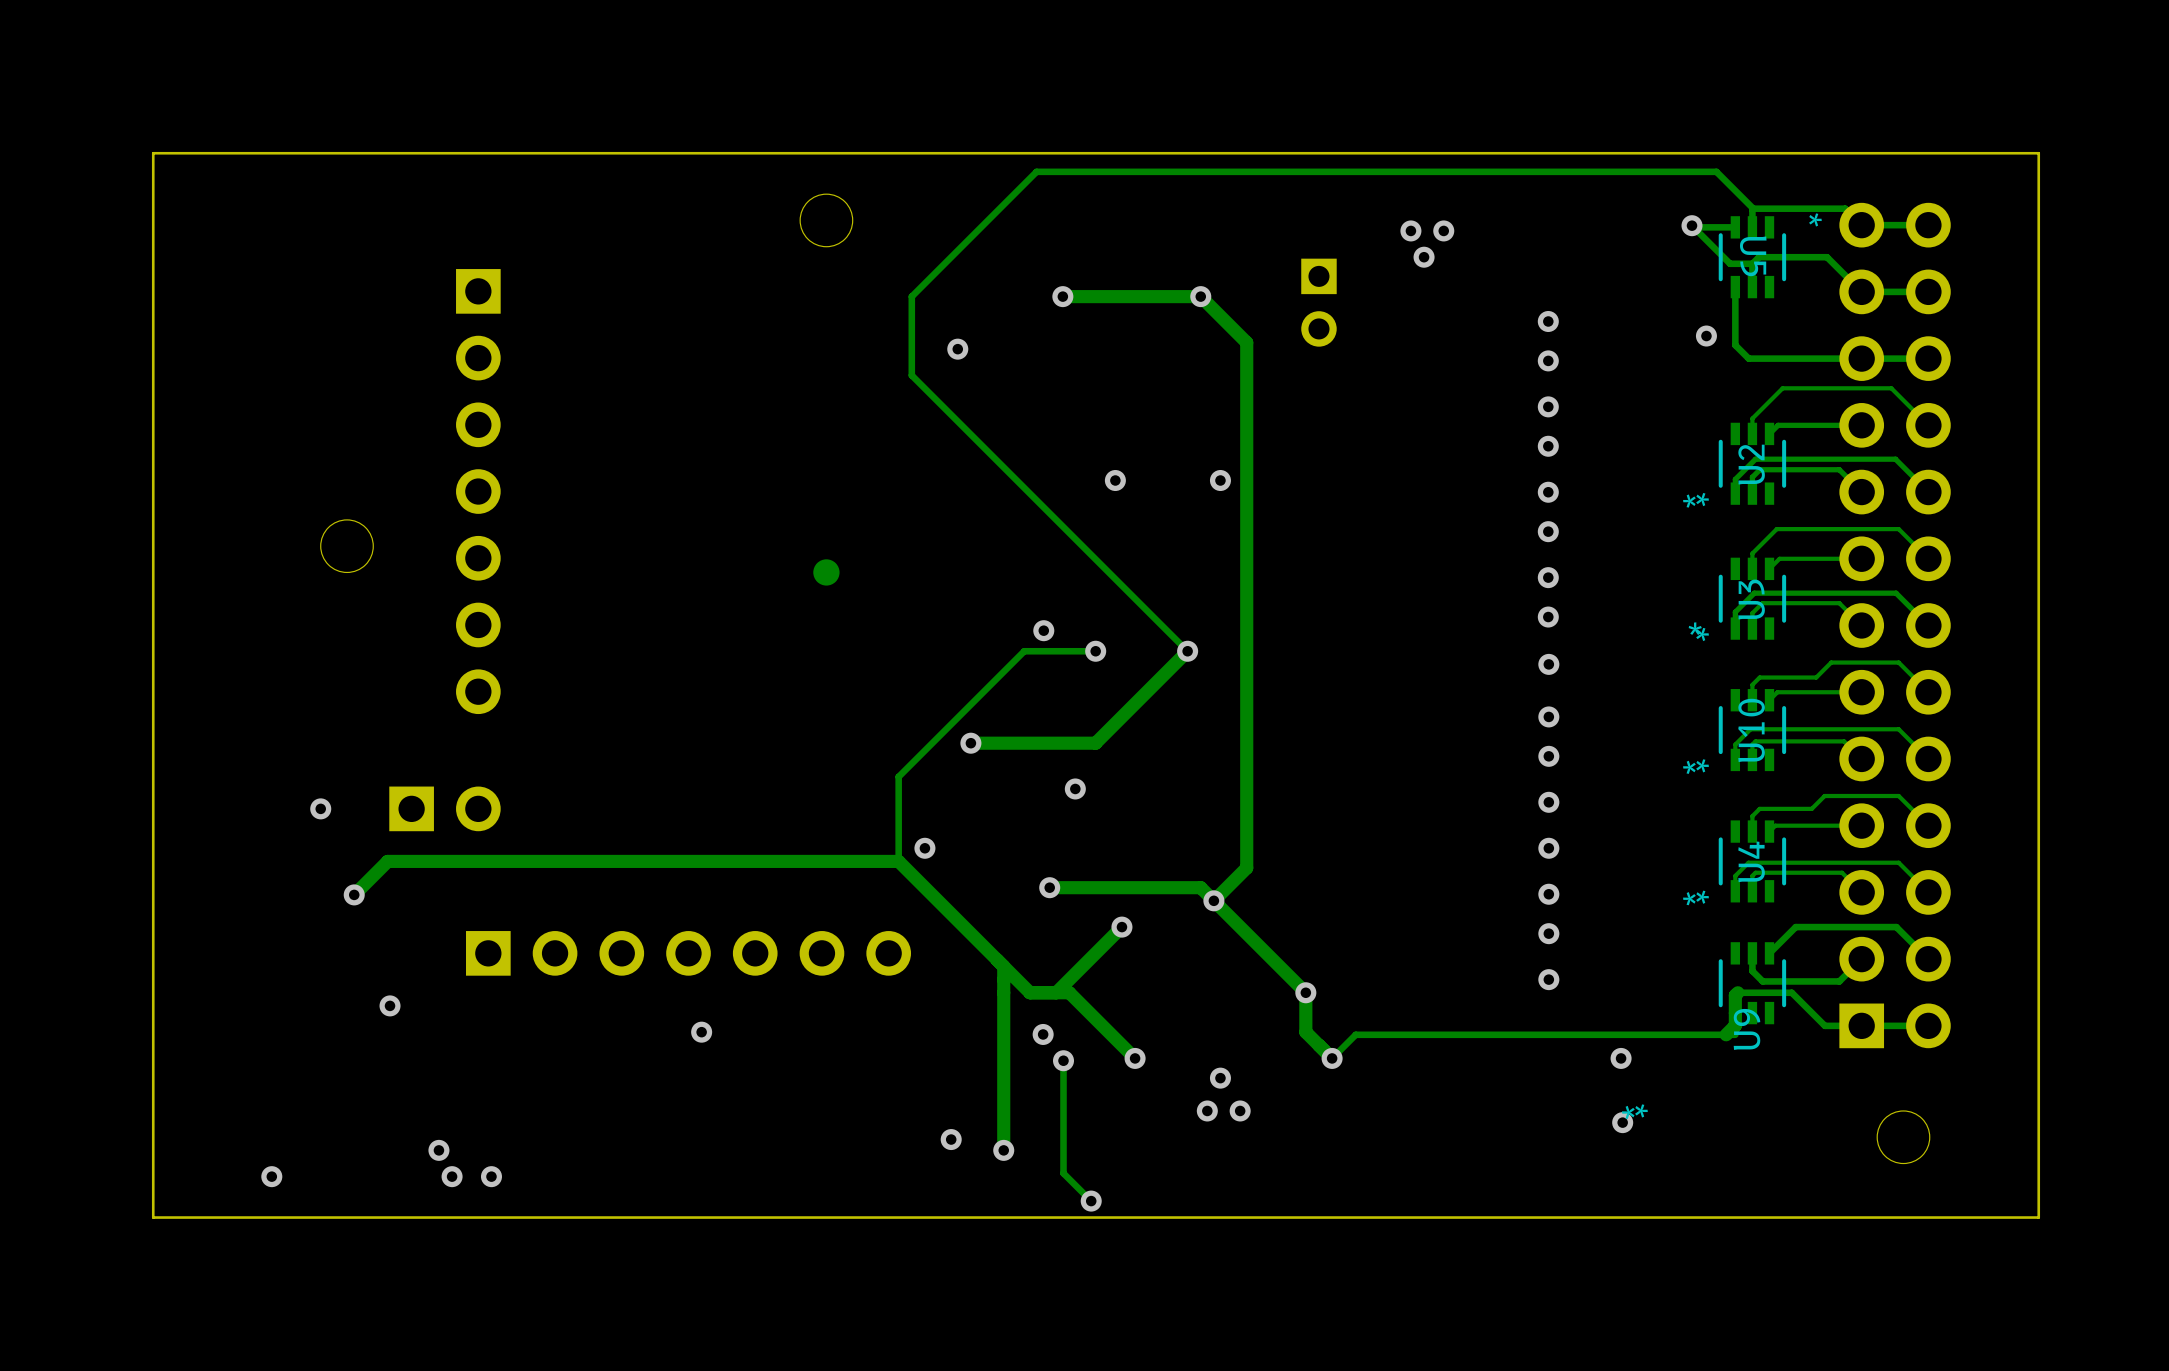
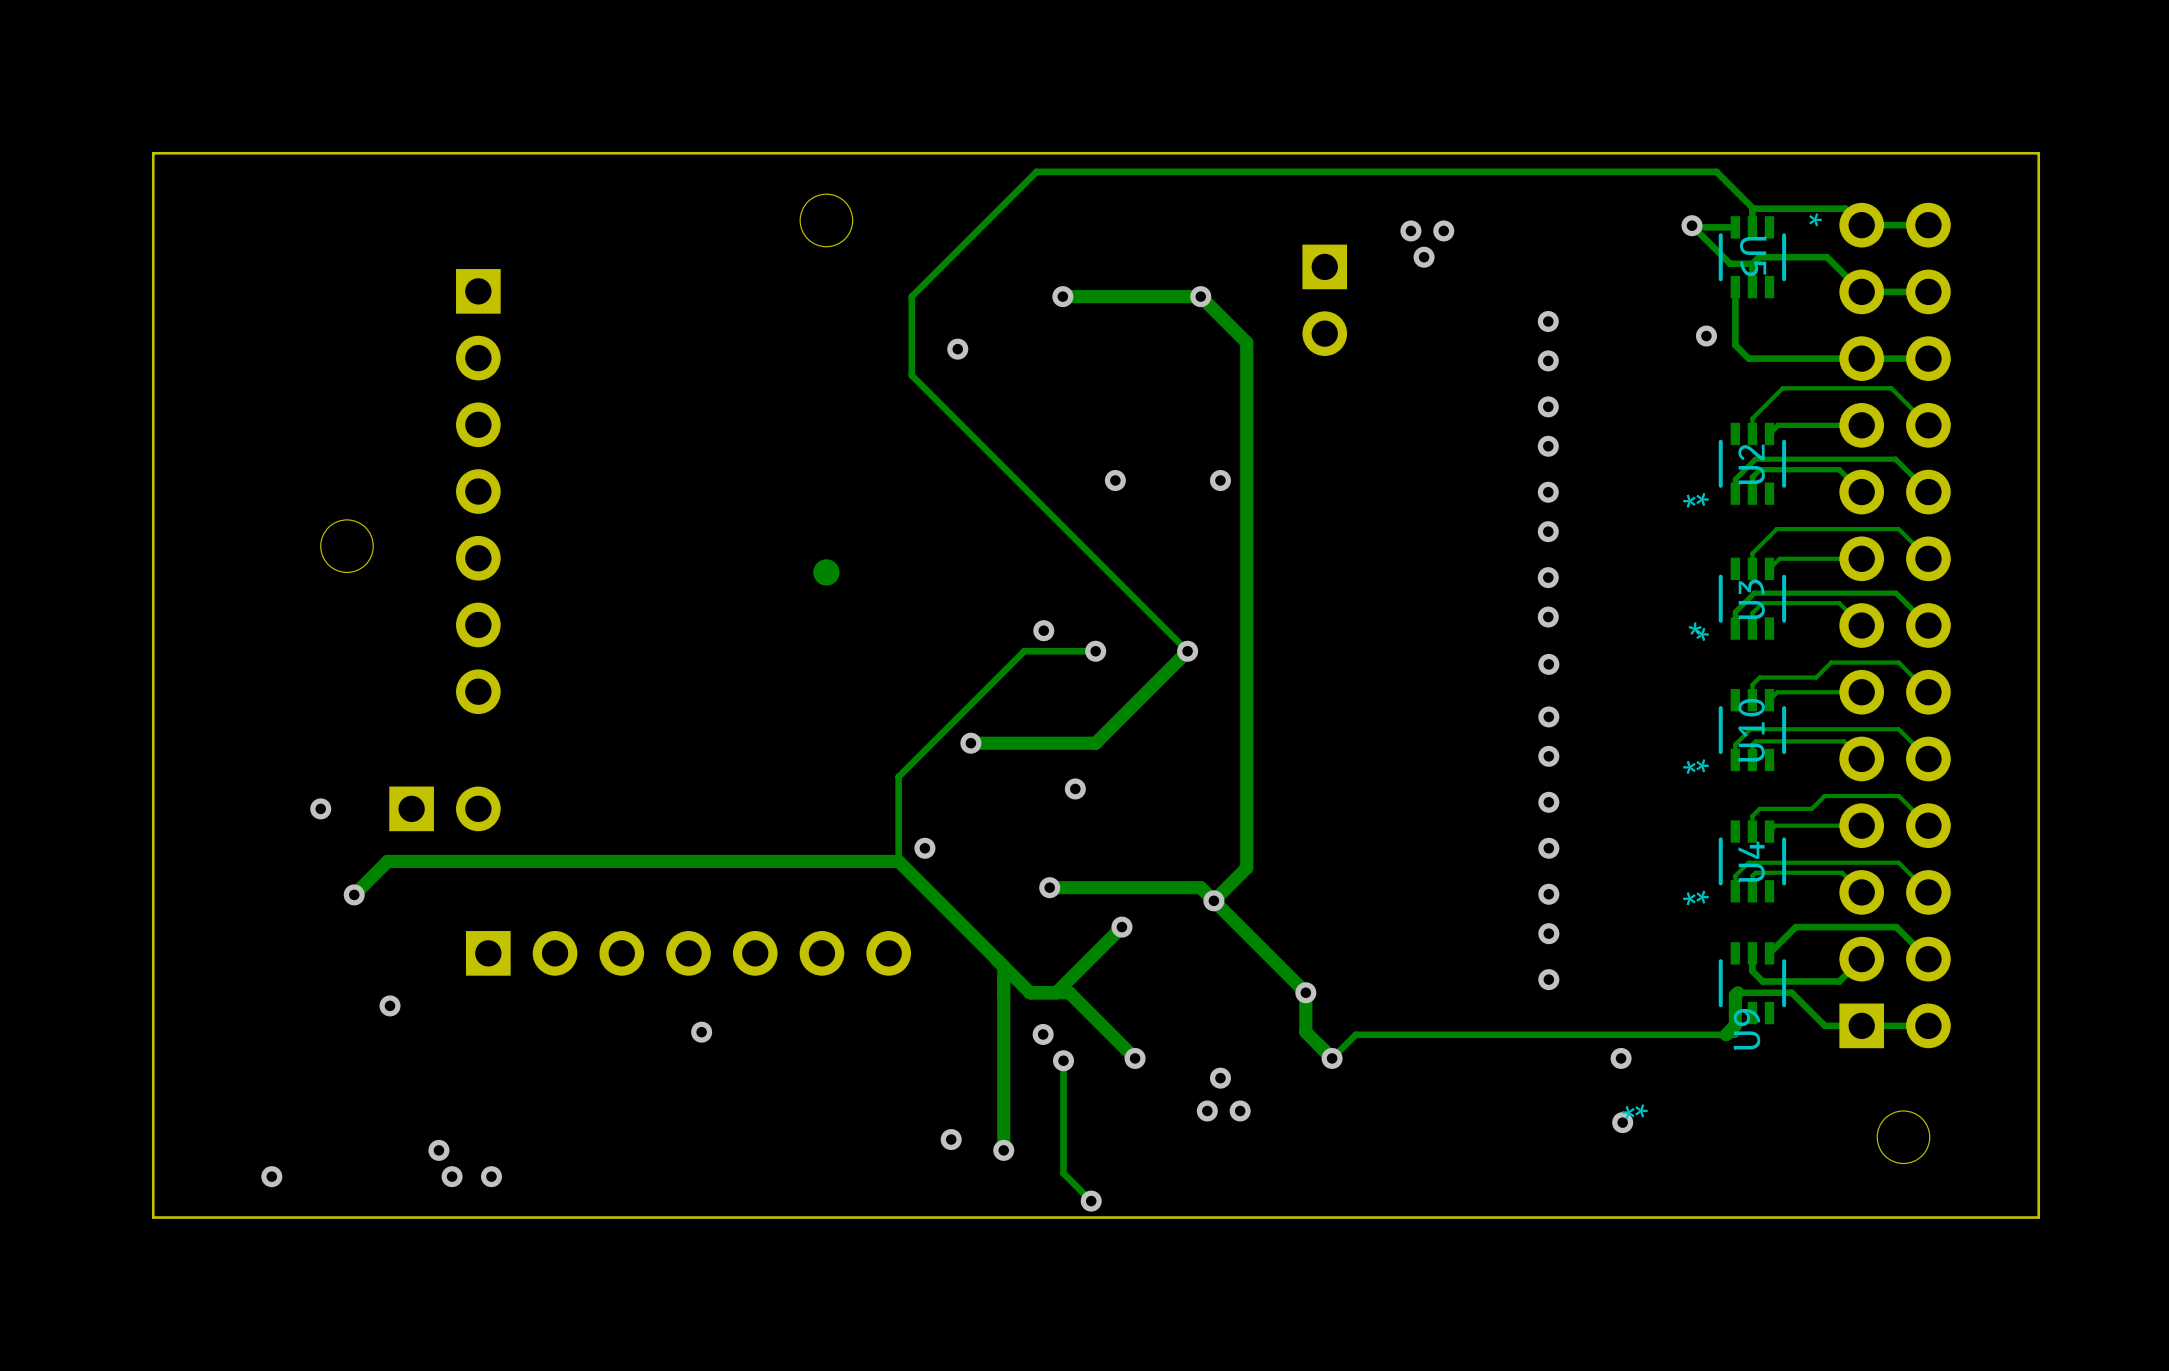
part footprint: [1301, 258, 1337, 347] -> [1302, 244, 1348, 356]

